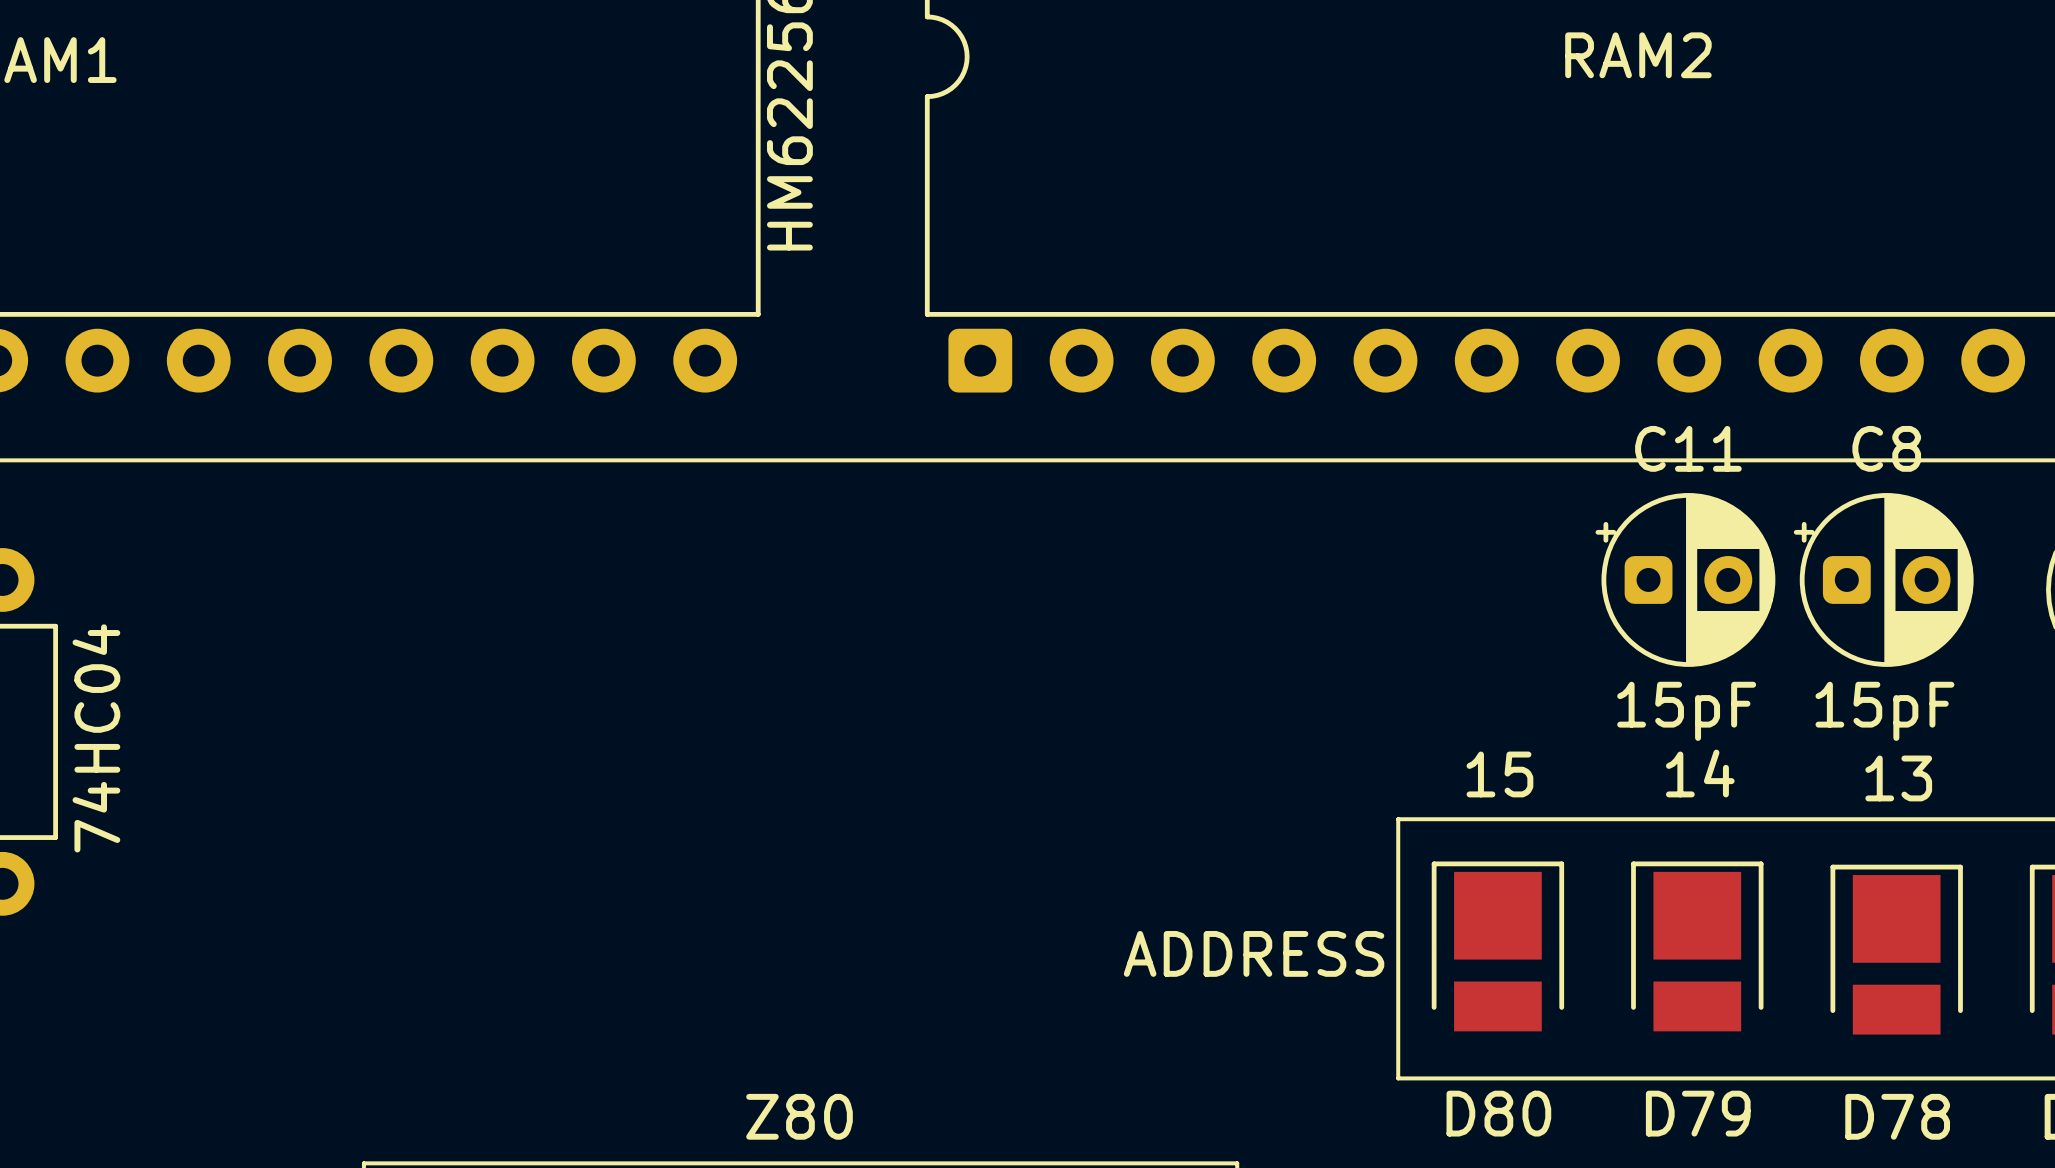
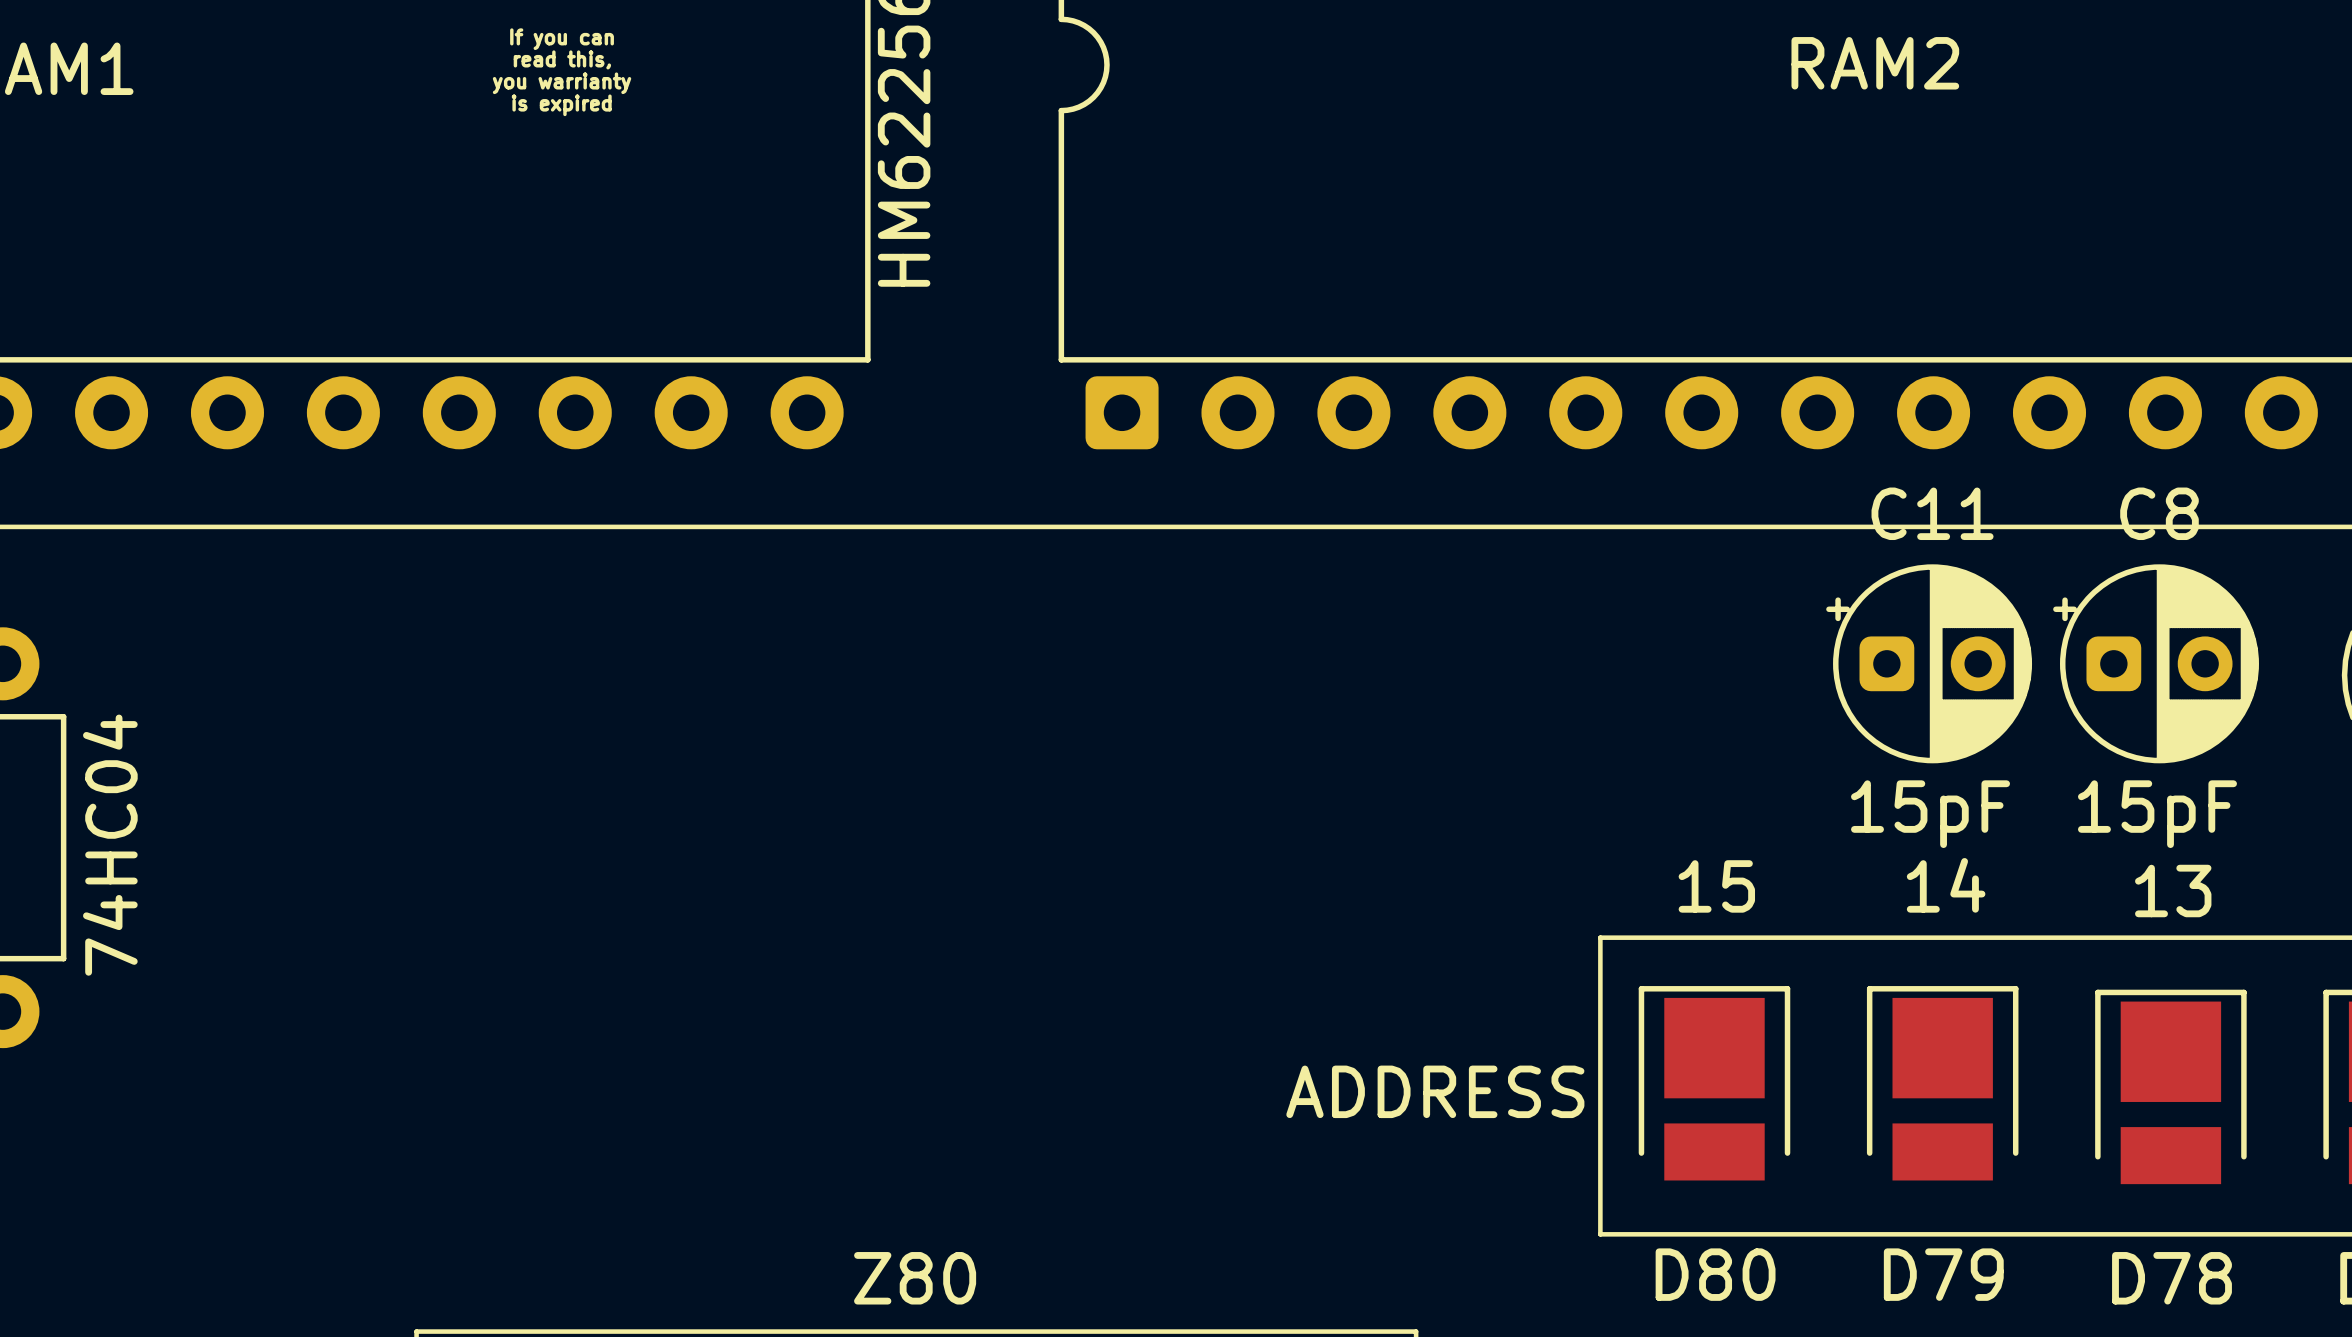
text: none -> If you can (562, 39)
text: none -> read this, (562, 59)
text: none -> you warrianty (562, 83)
text: none -> is expired (561, 105)

